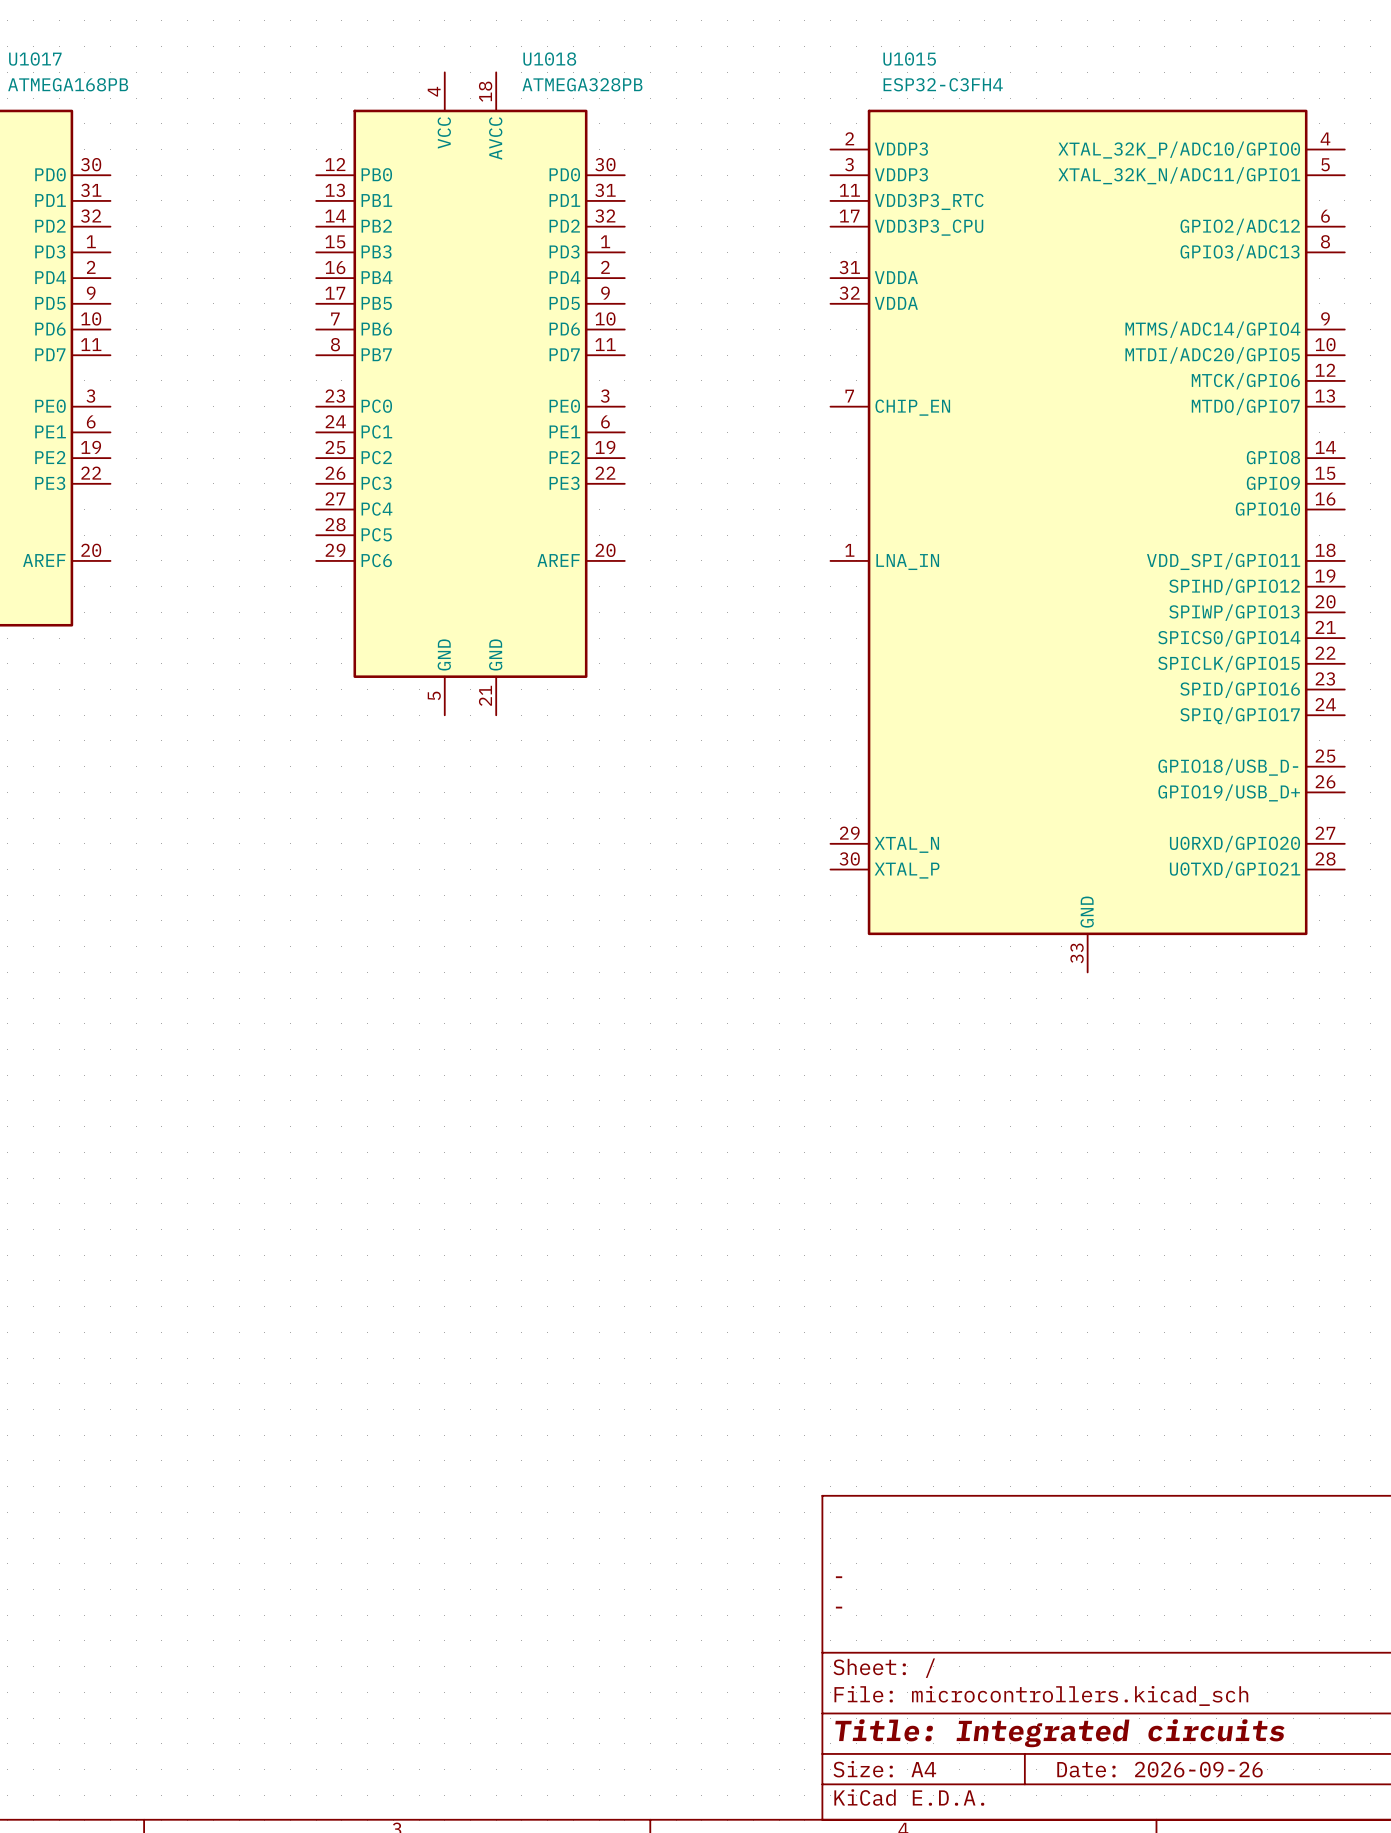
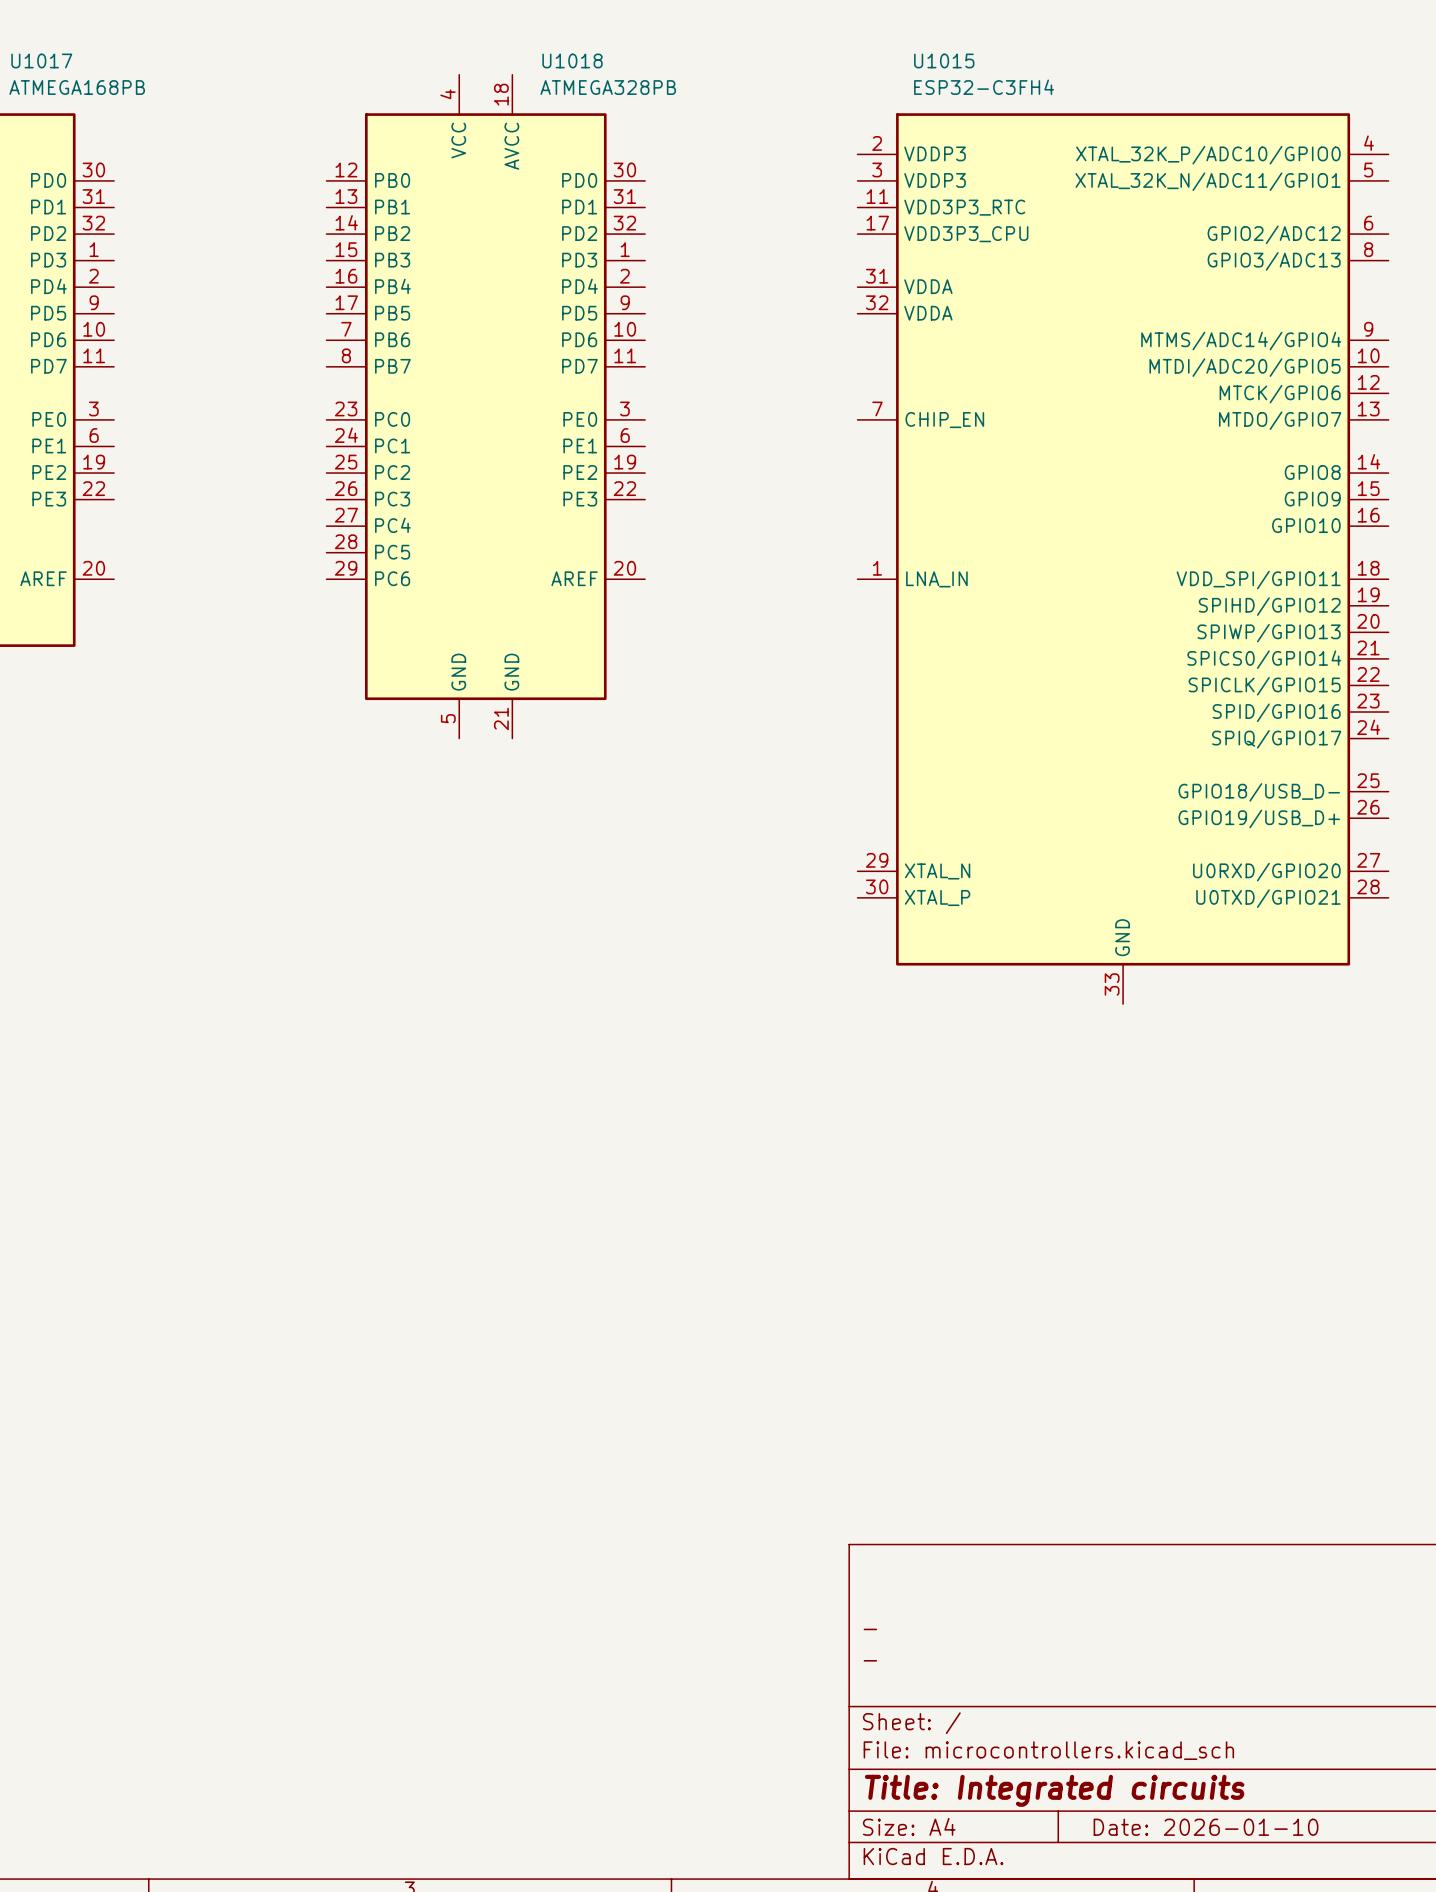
title block: Date: 2026-09-26 (1160, 1769) -> Date: 2026-01-10 (1206, 1827)

